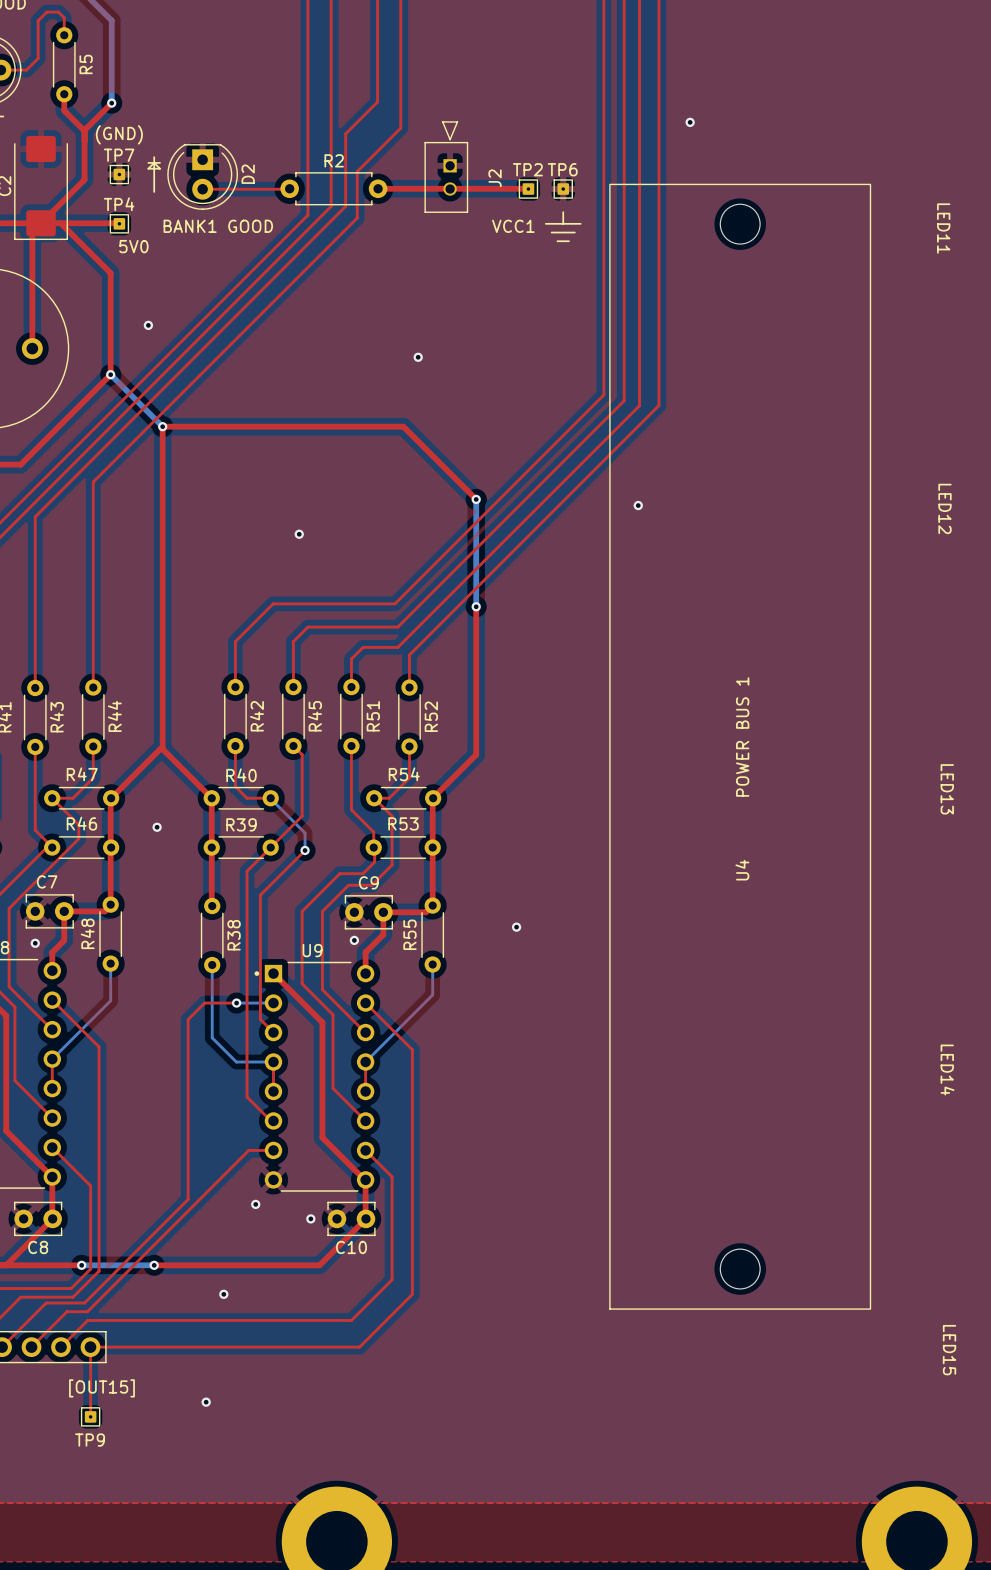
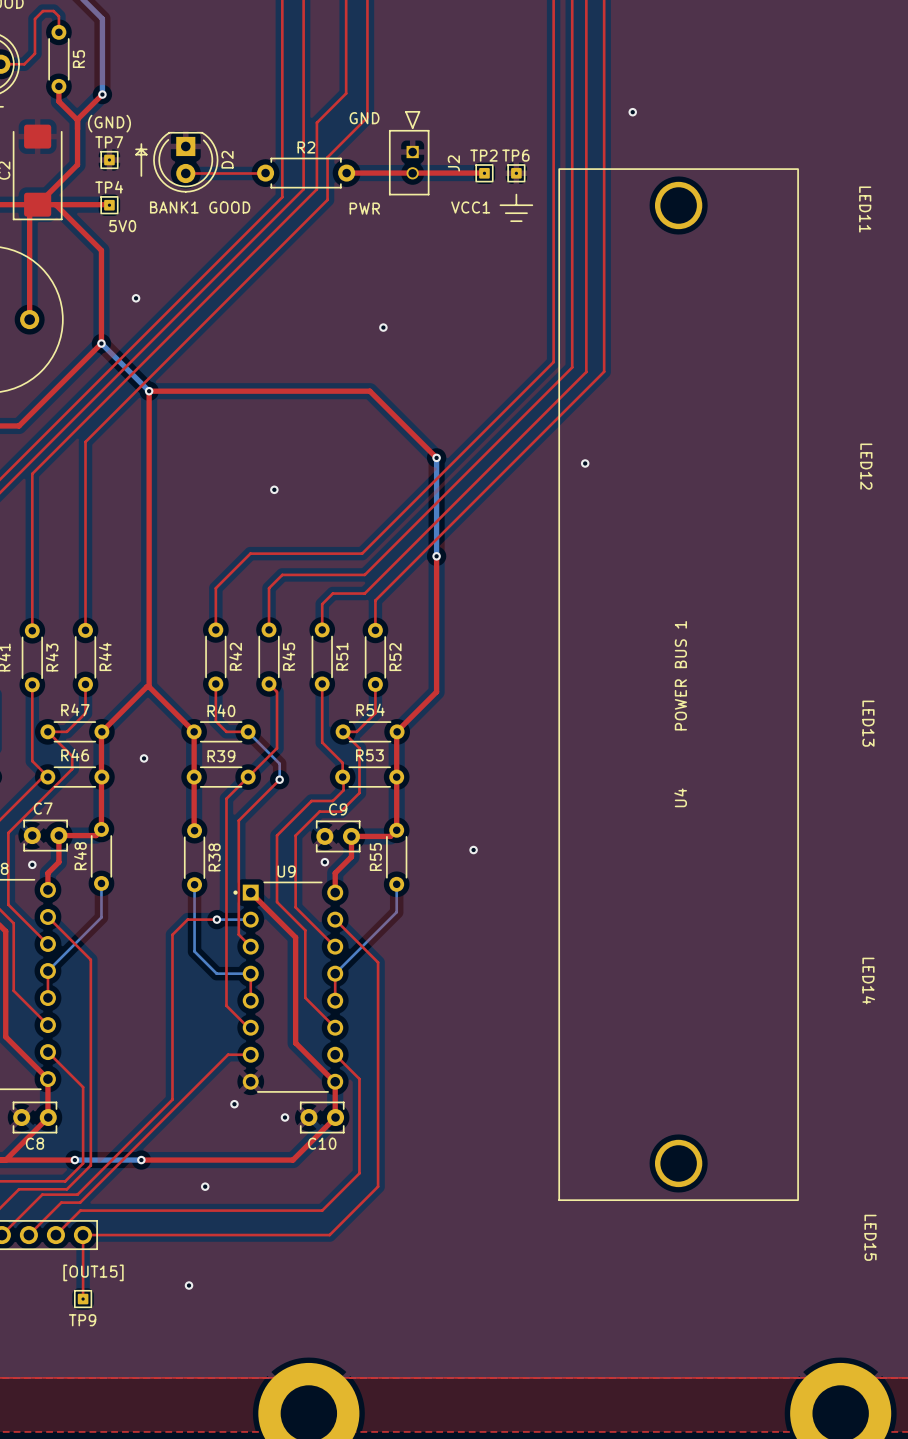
text: none -> GND (364, 118)
U4 footprint: [609, 183, 872, 1310] -> [558, 168, 799, 1201]
text: none -> PWR (364, 208)

